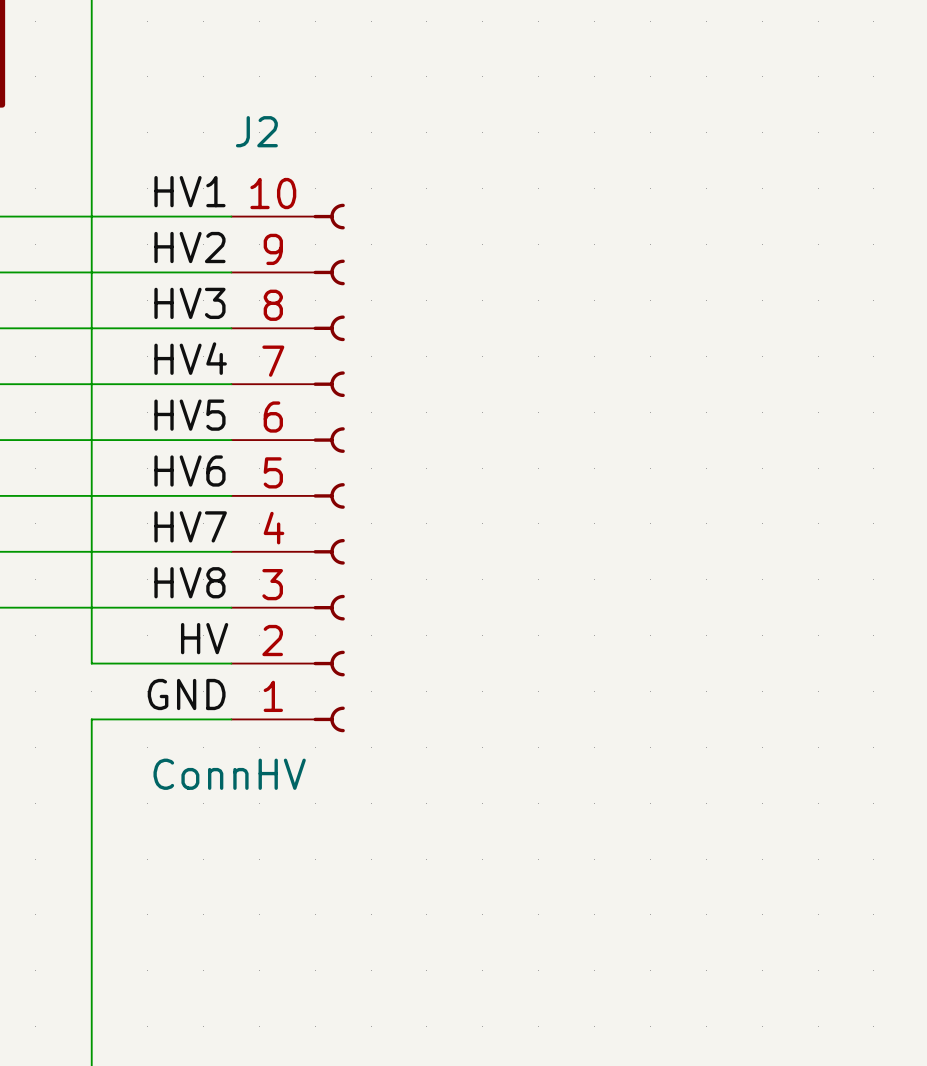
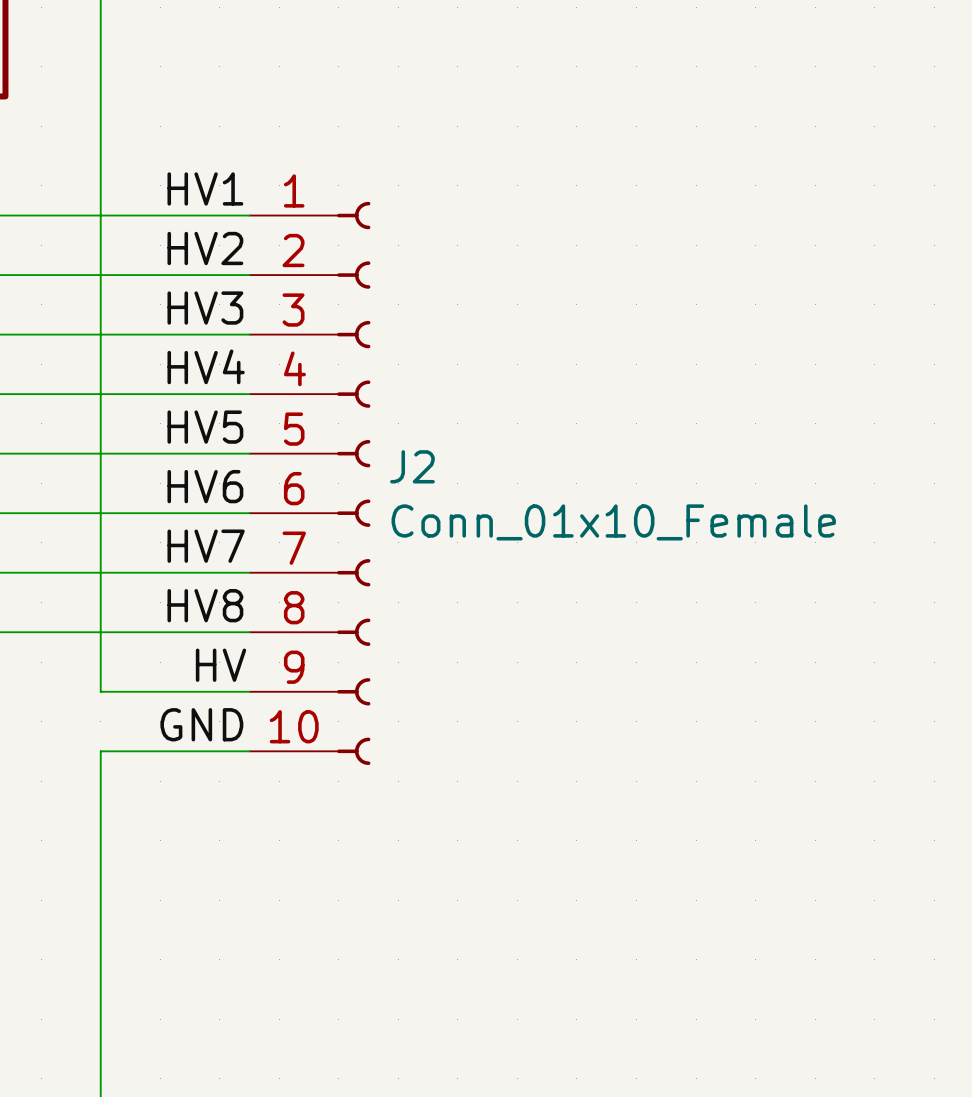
J2 name position: J2 (256, 131) -> J2 (412, 466)
J2 flip: as is (329, 468) -> up-down (353, 483)
J2 value: ConnHV (229, 774) -> Conn_01x10_Female (613, 522)

